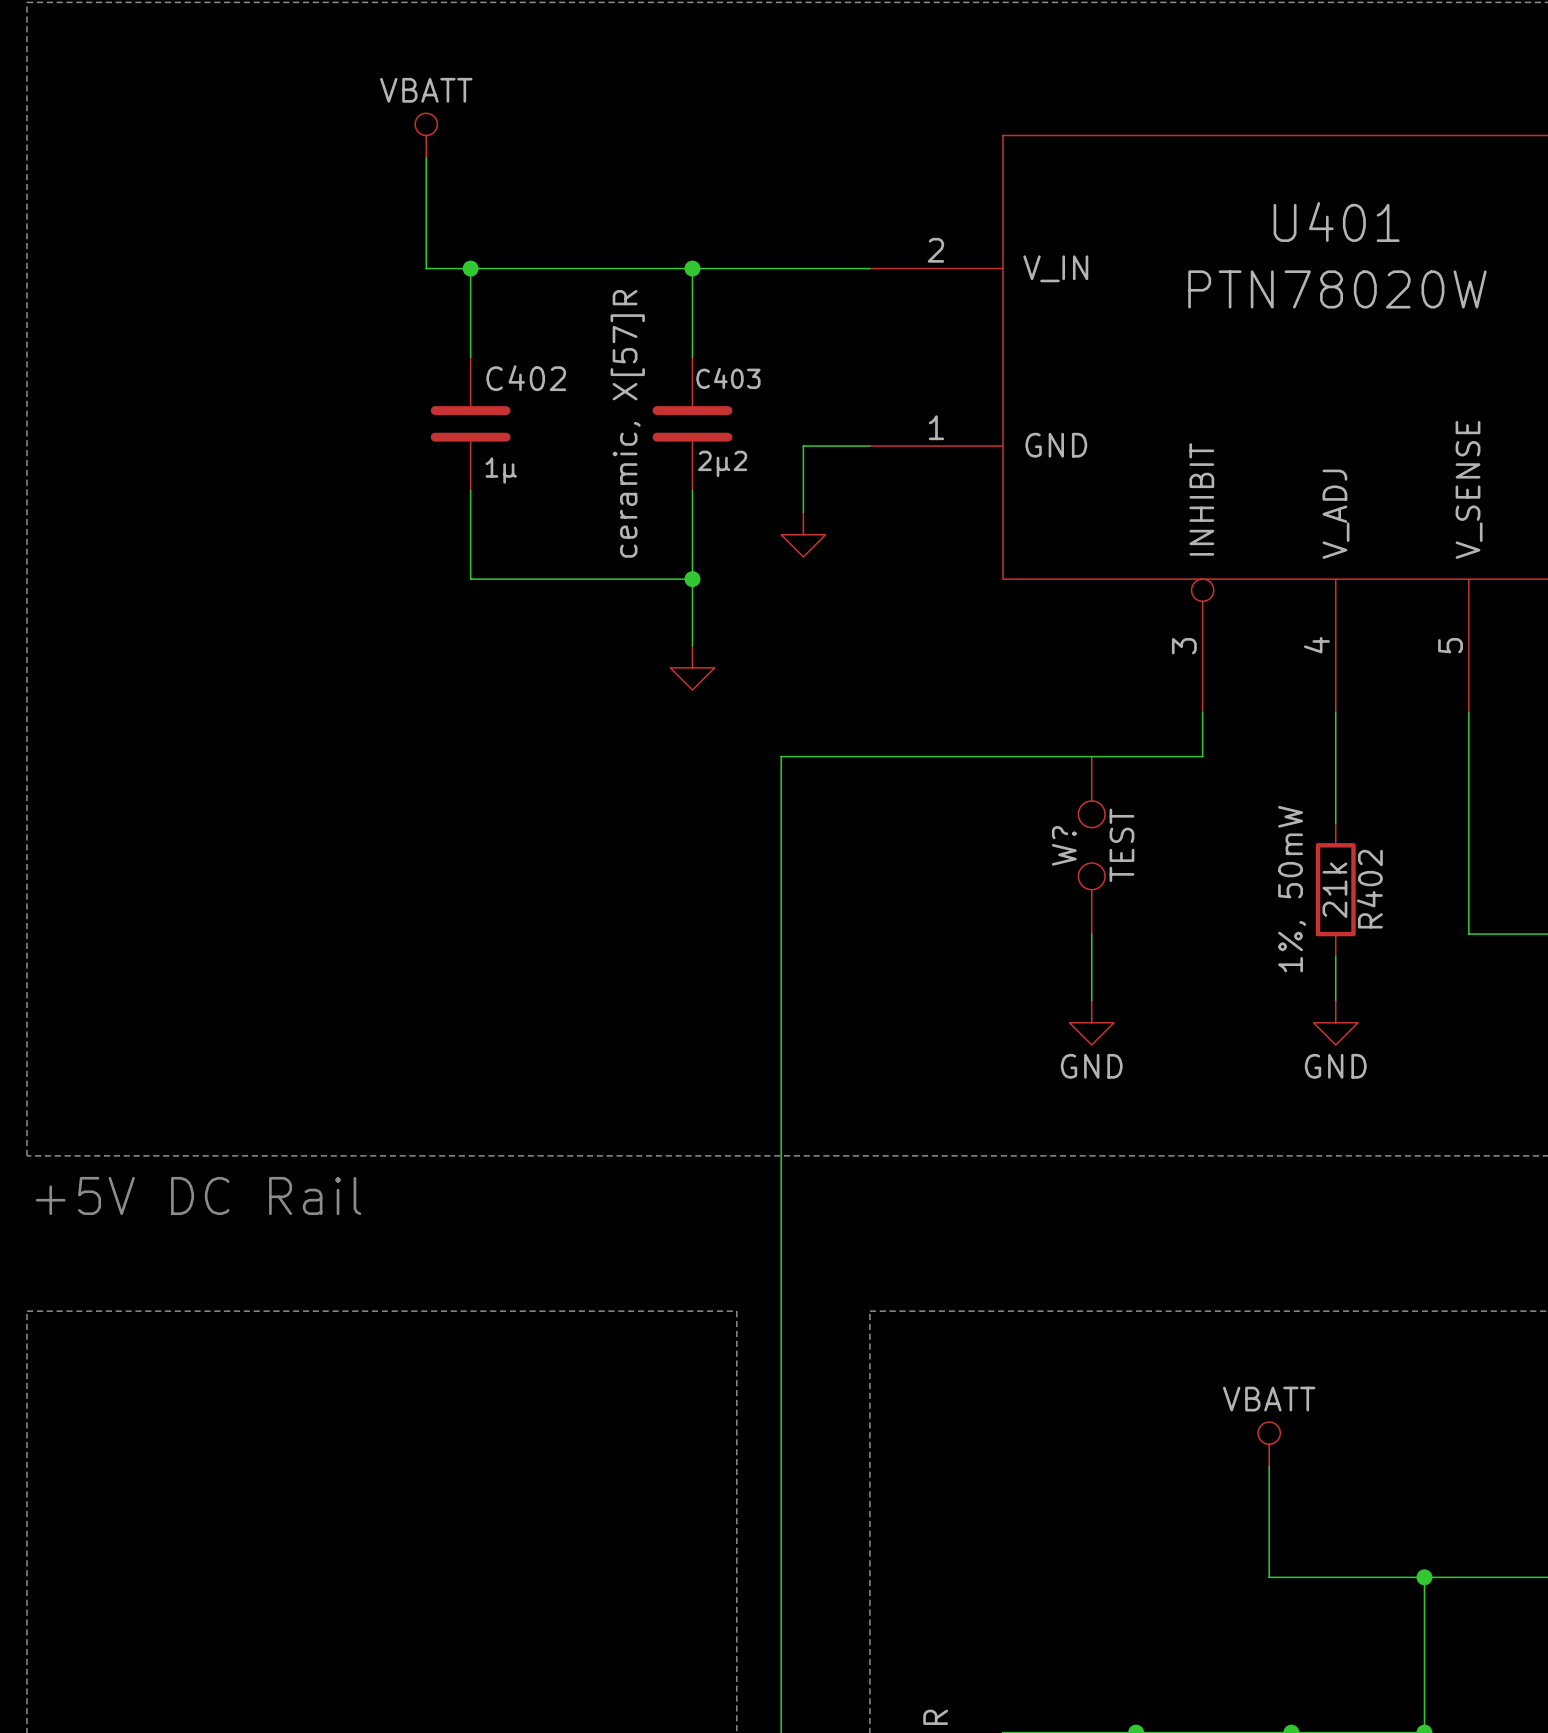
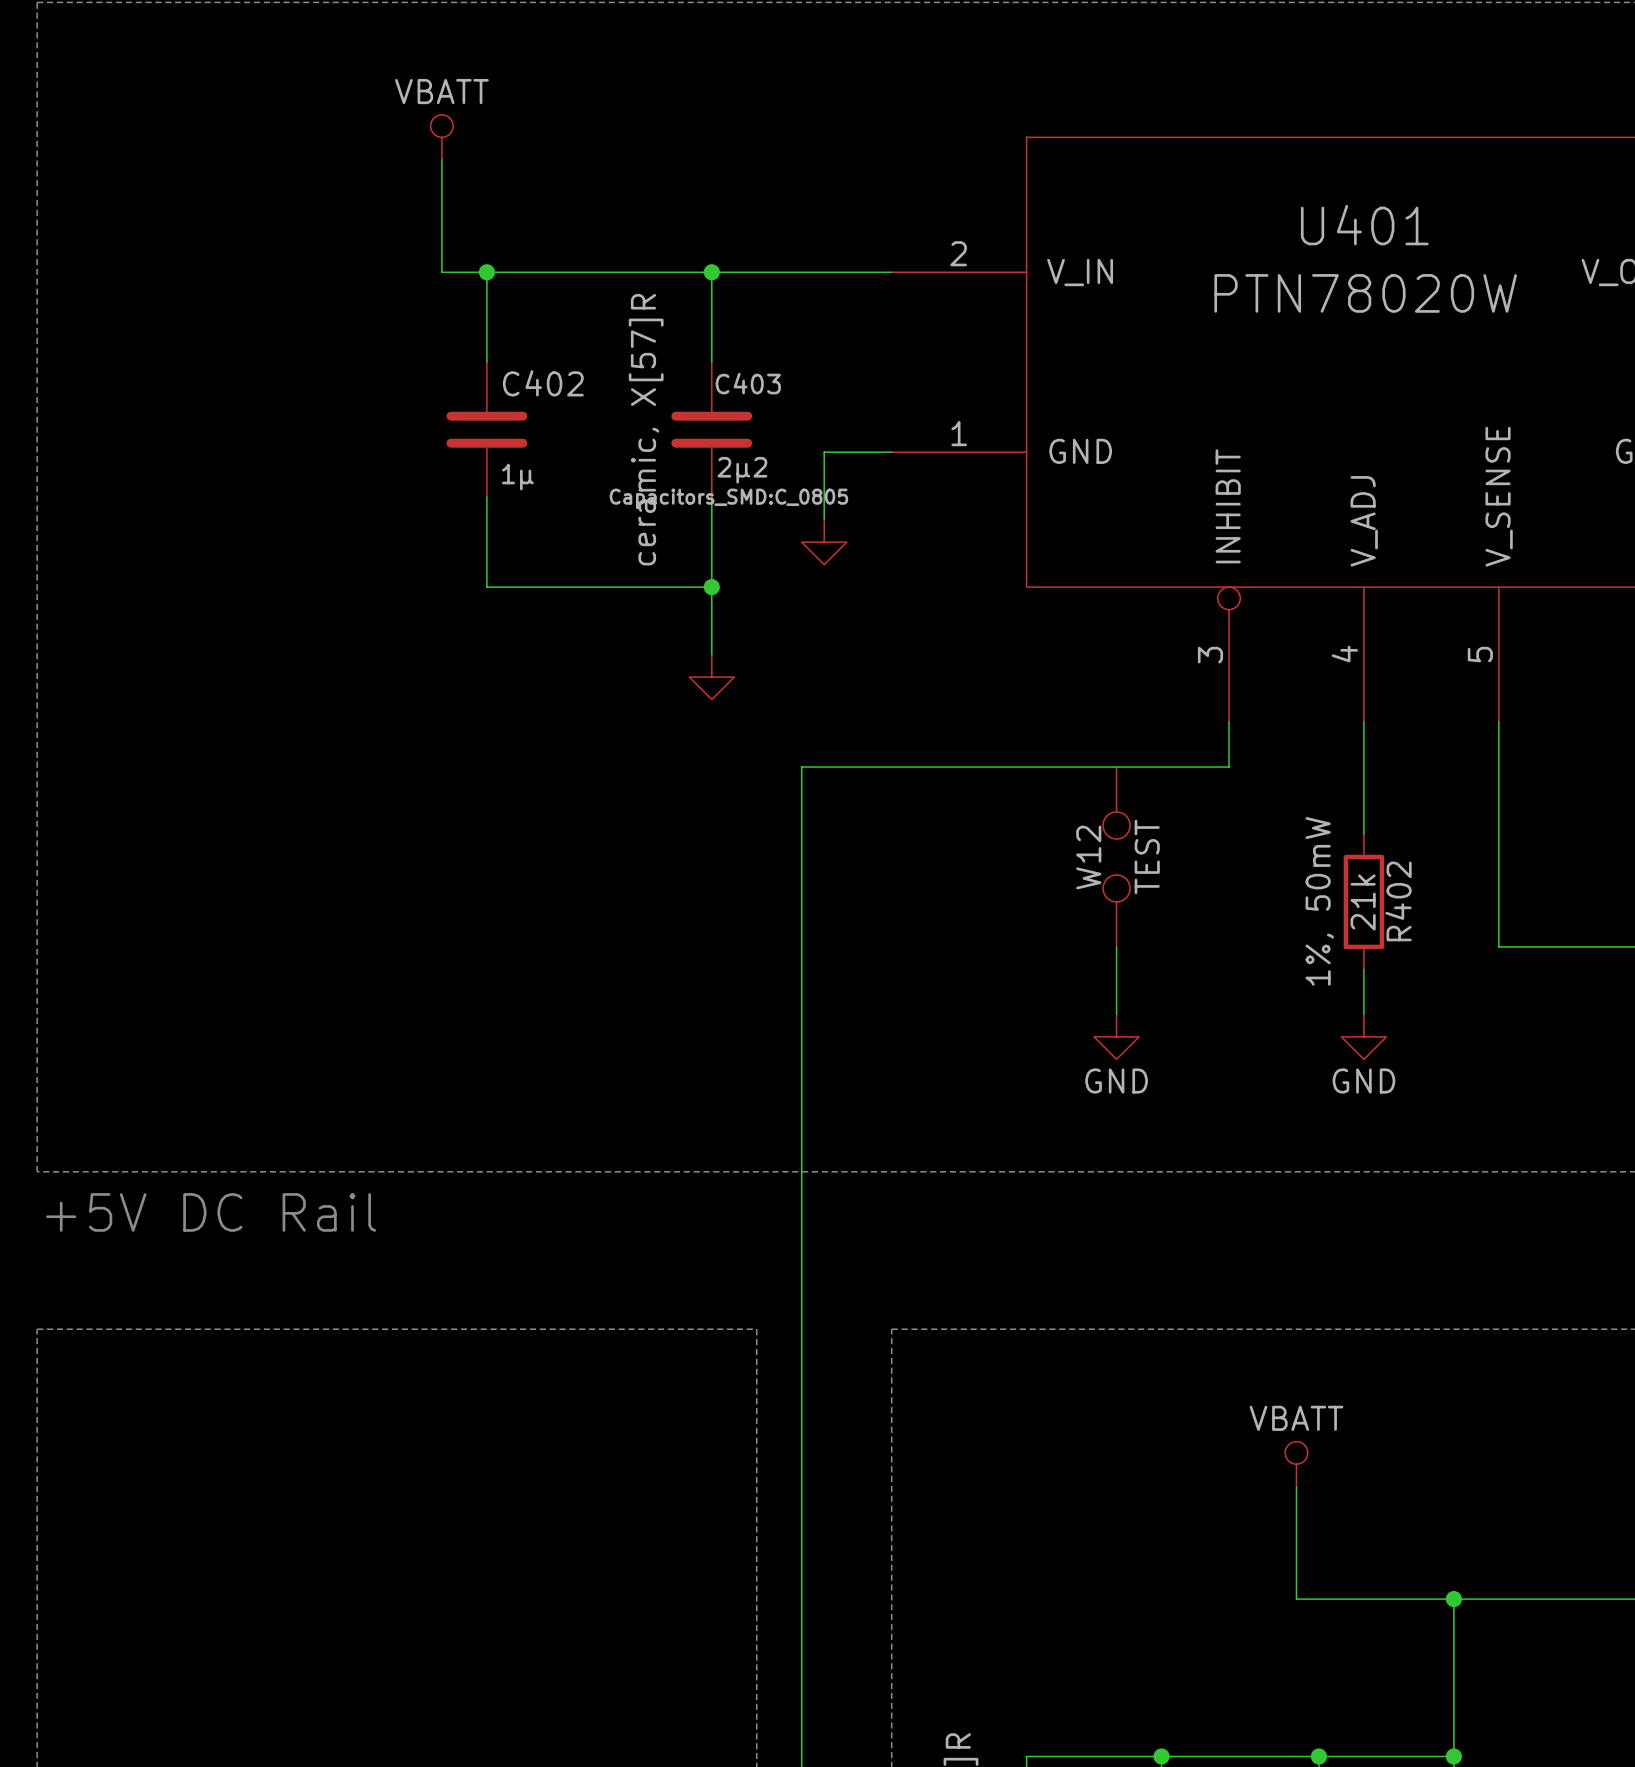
C403 text: none -> Capacitors_SMD:C_0805 (728, 498)
W? name: W? (1064, 845) -> W12 (1088, 857)

